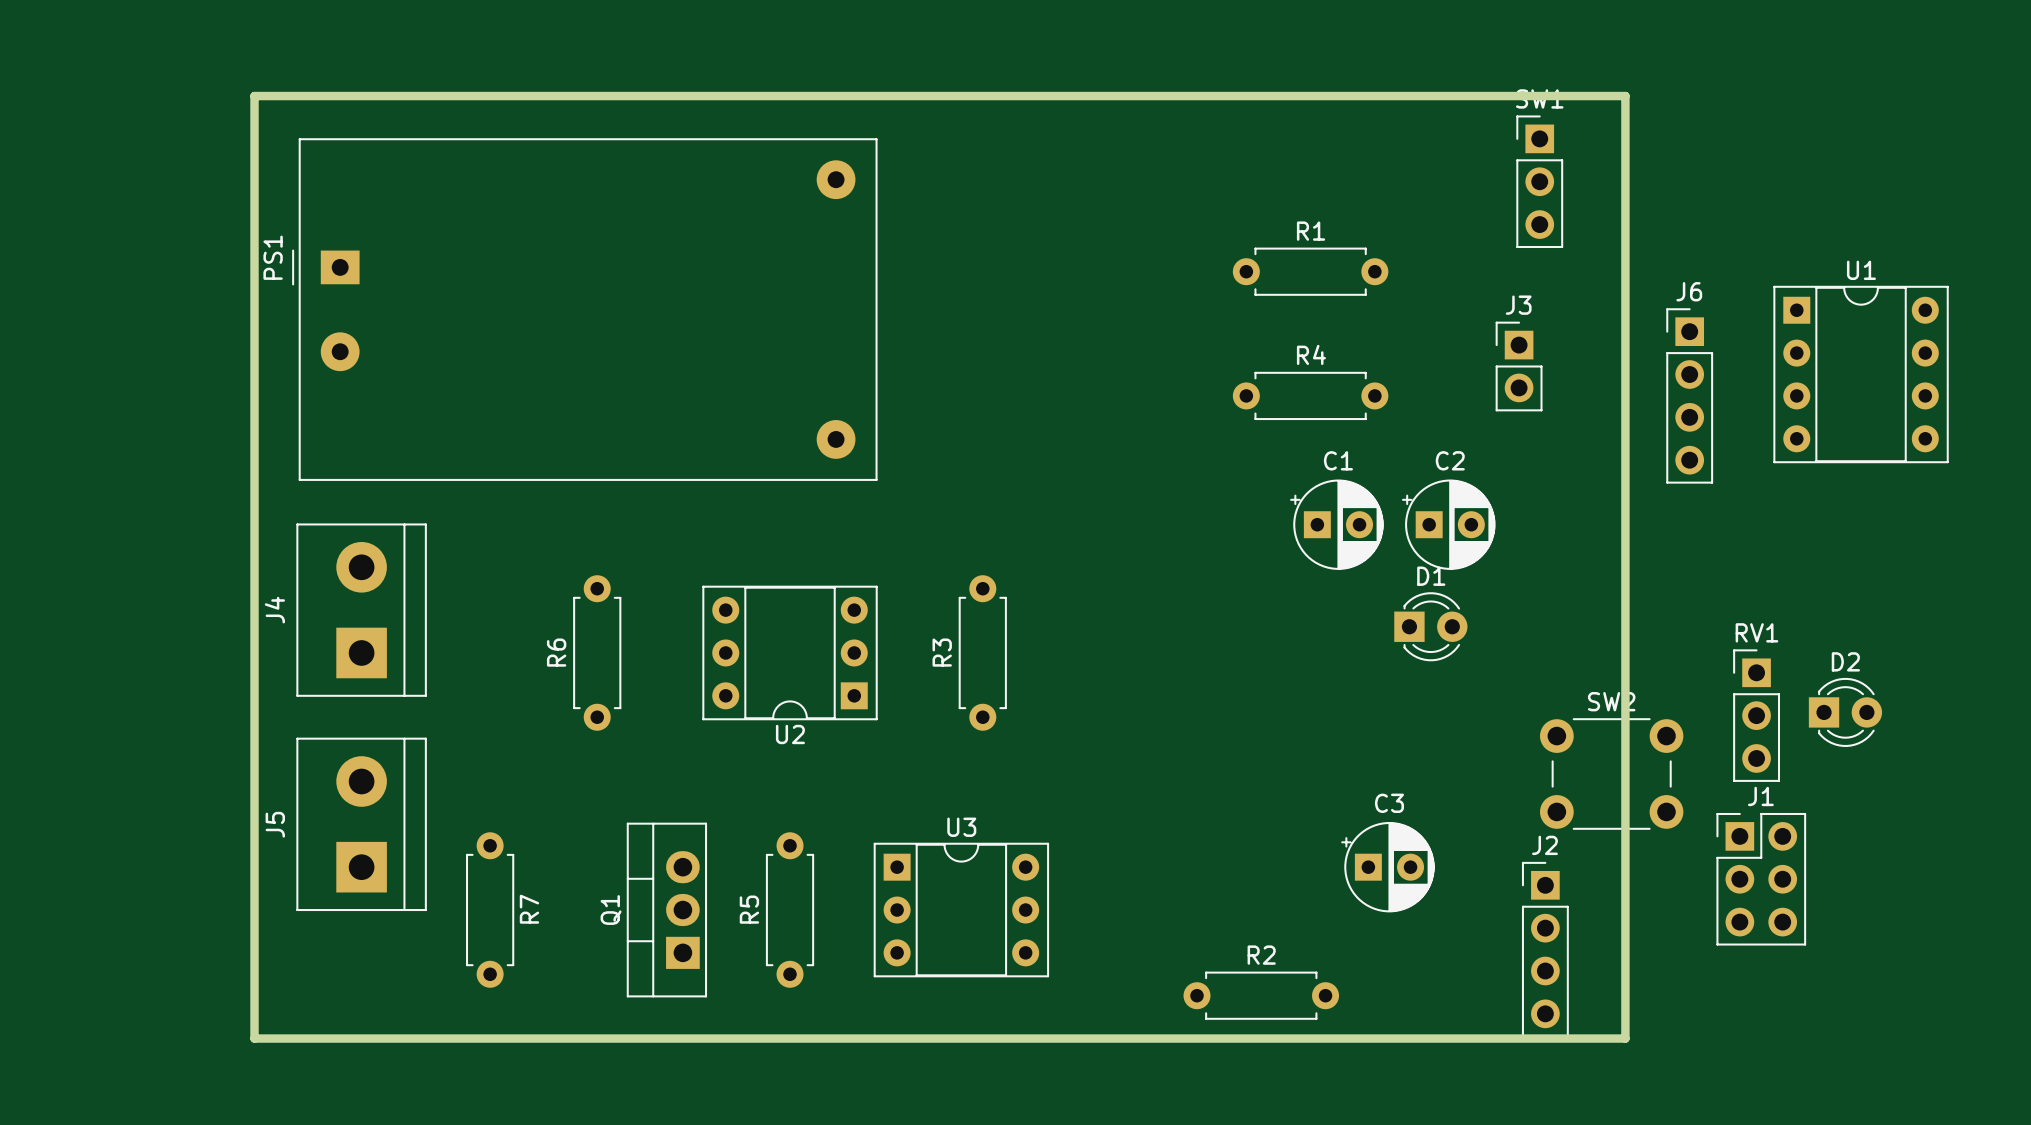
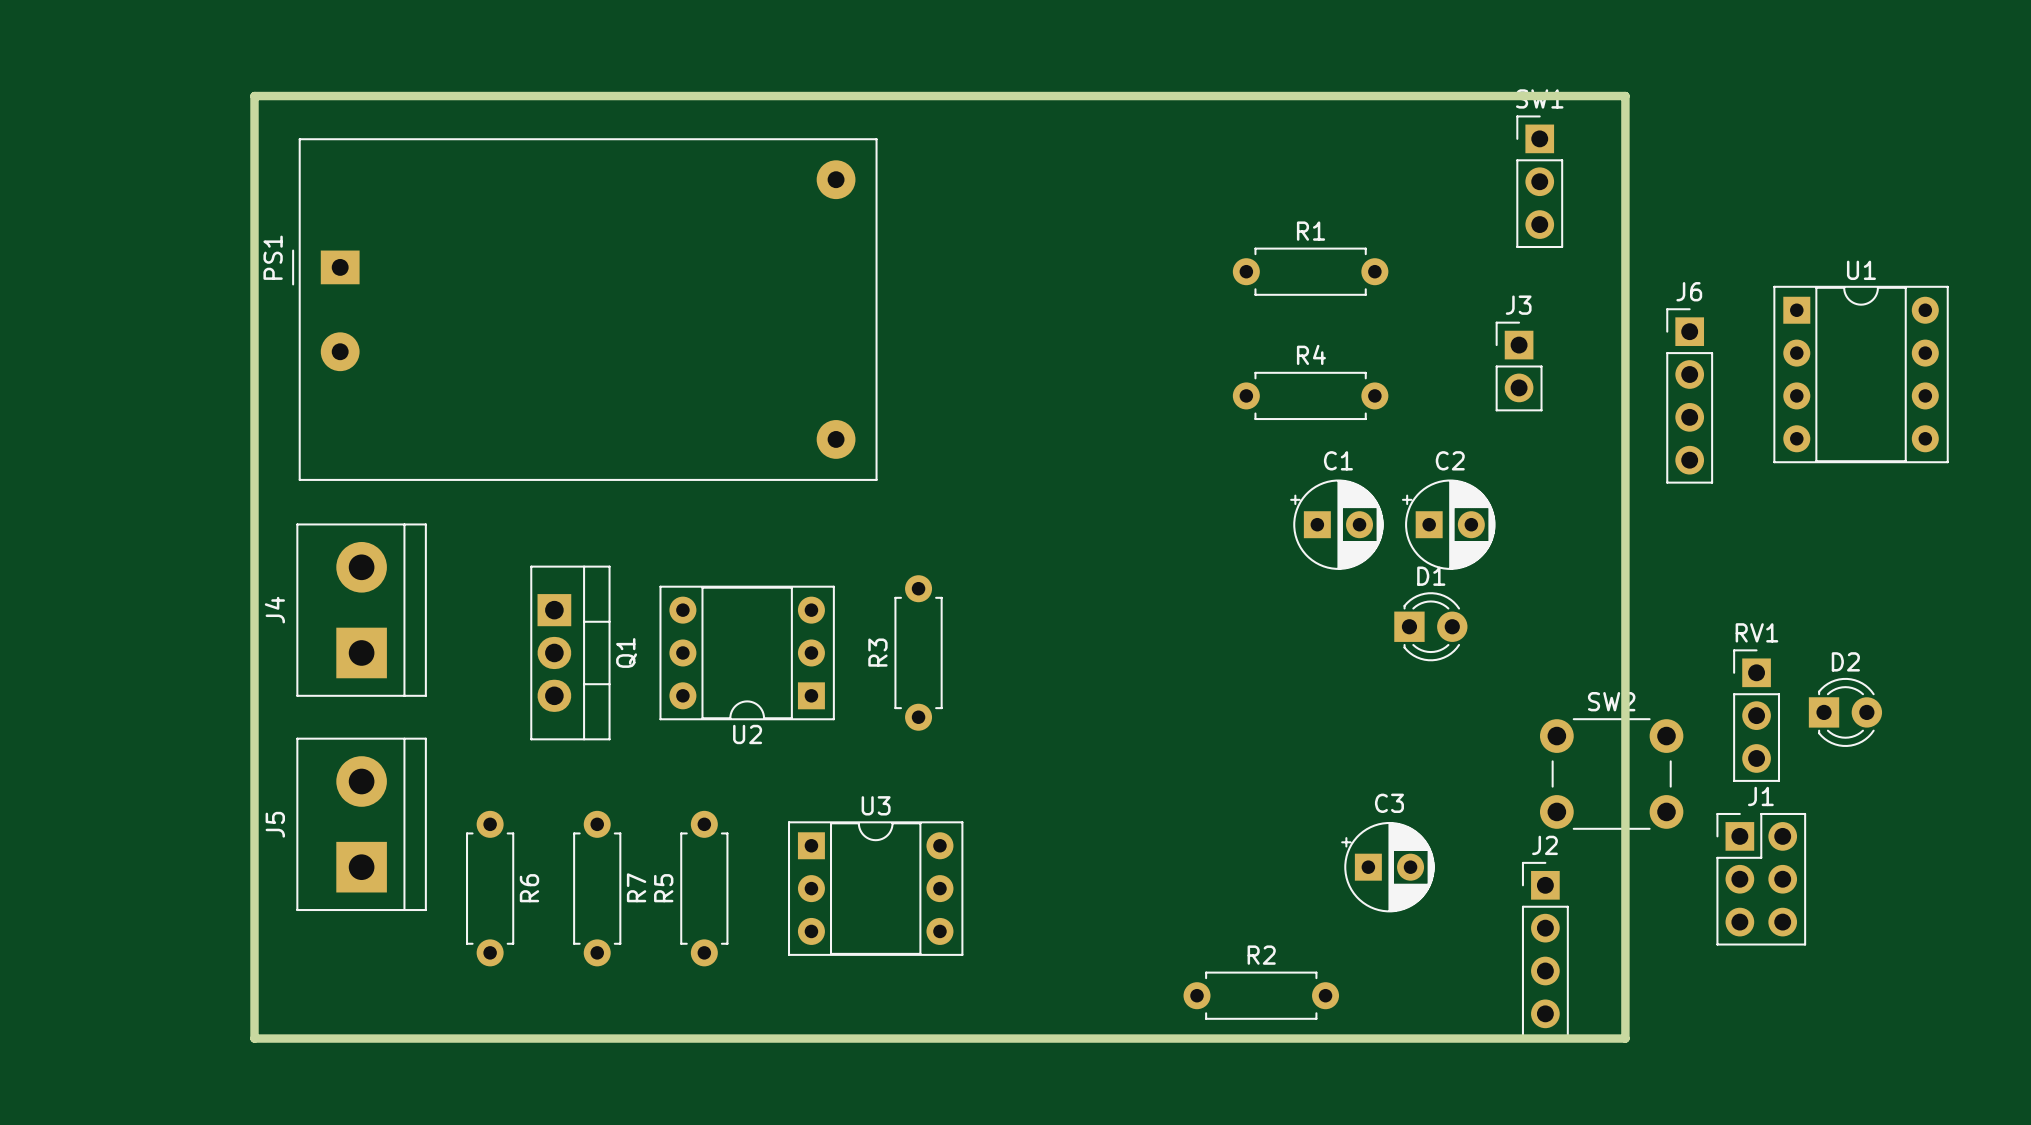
R6 name position: R6 (556, 652) -> R6 (529, 888)
R6 position: (597, 652) -> (490, 888)
U2 position: (790, 652) -> (747, 652)
R3 position: (982, 652) -> (918, 652)
R7 position: (490, 910) -> (597, 888)
Q1 rotation: 0° (666, 910) -> 180° (570, 652)
Q1 position: (666, 910) -> (570, 652)
R5 position: (790, 910) -> (704, 888)
U3 position: (961, 910) -> (875, 888)

